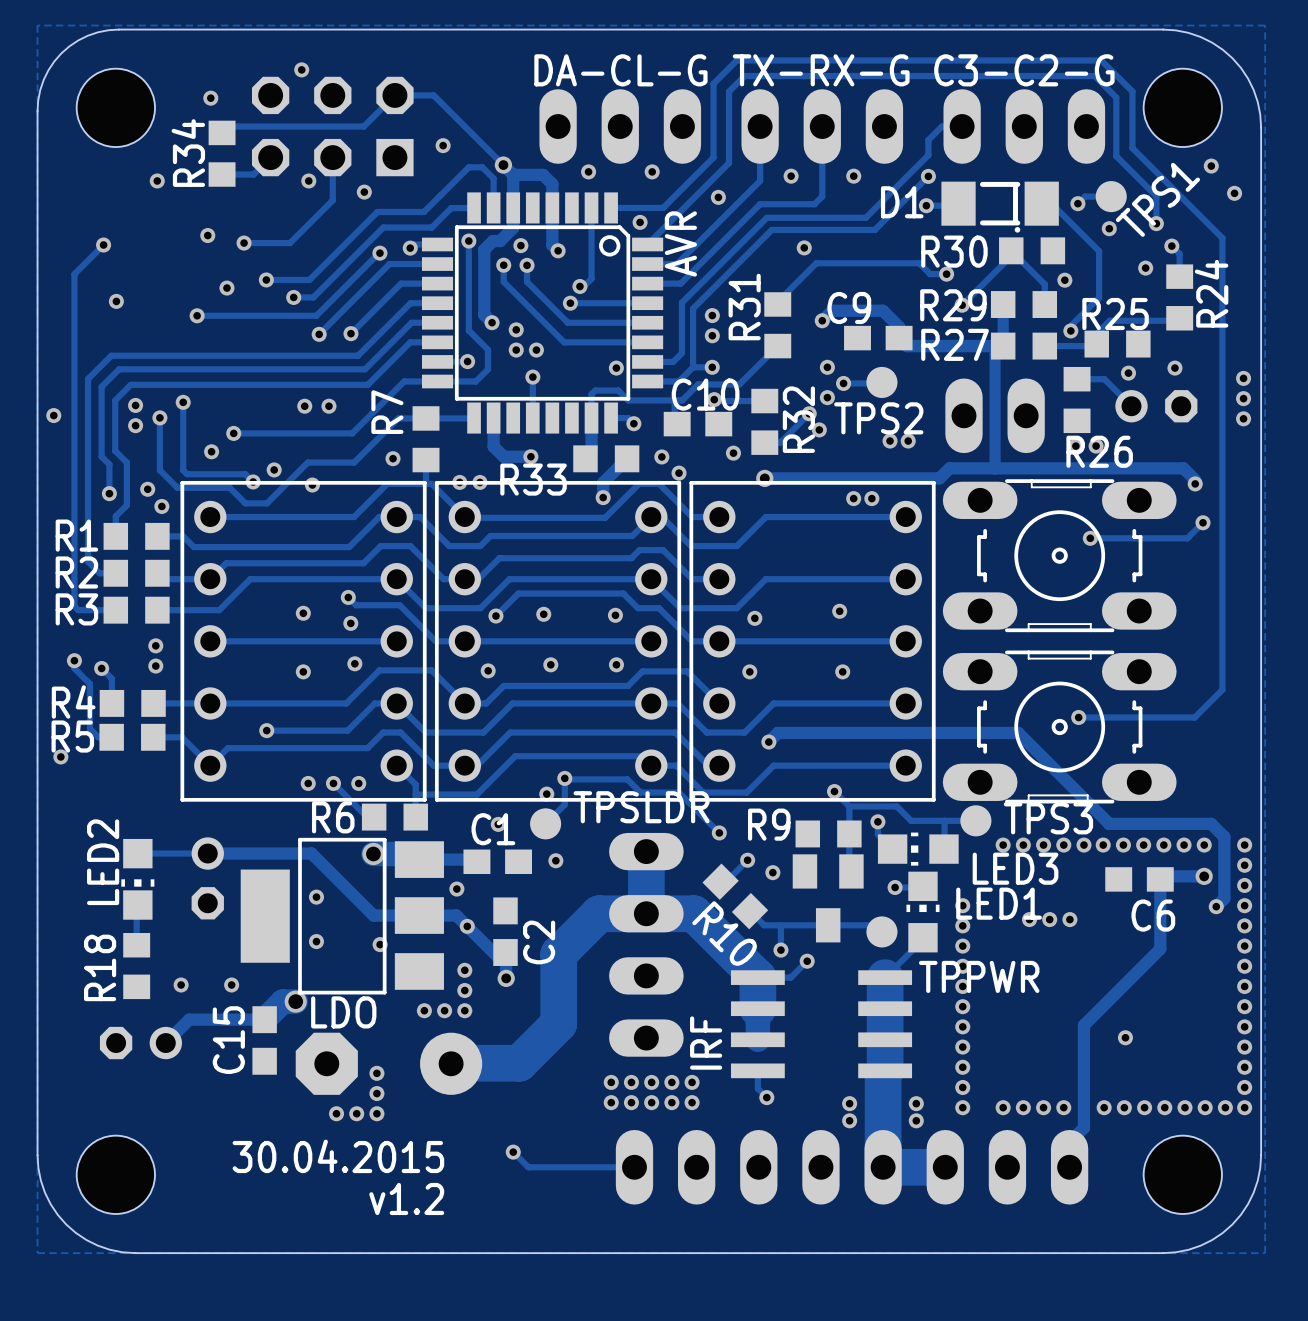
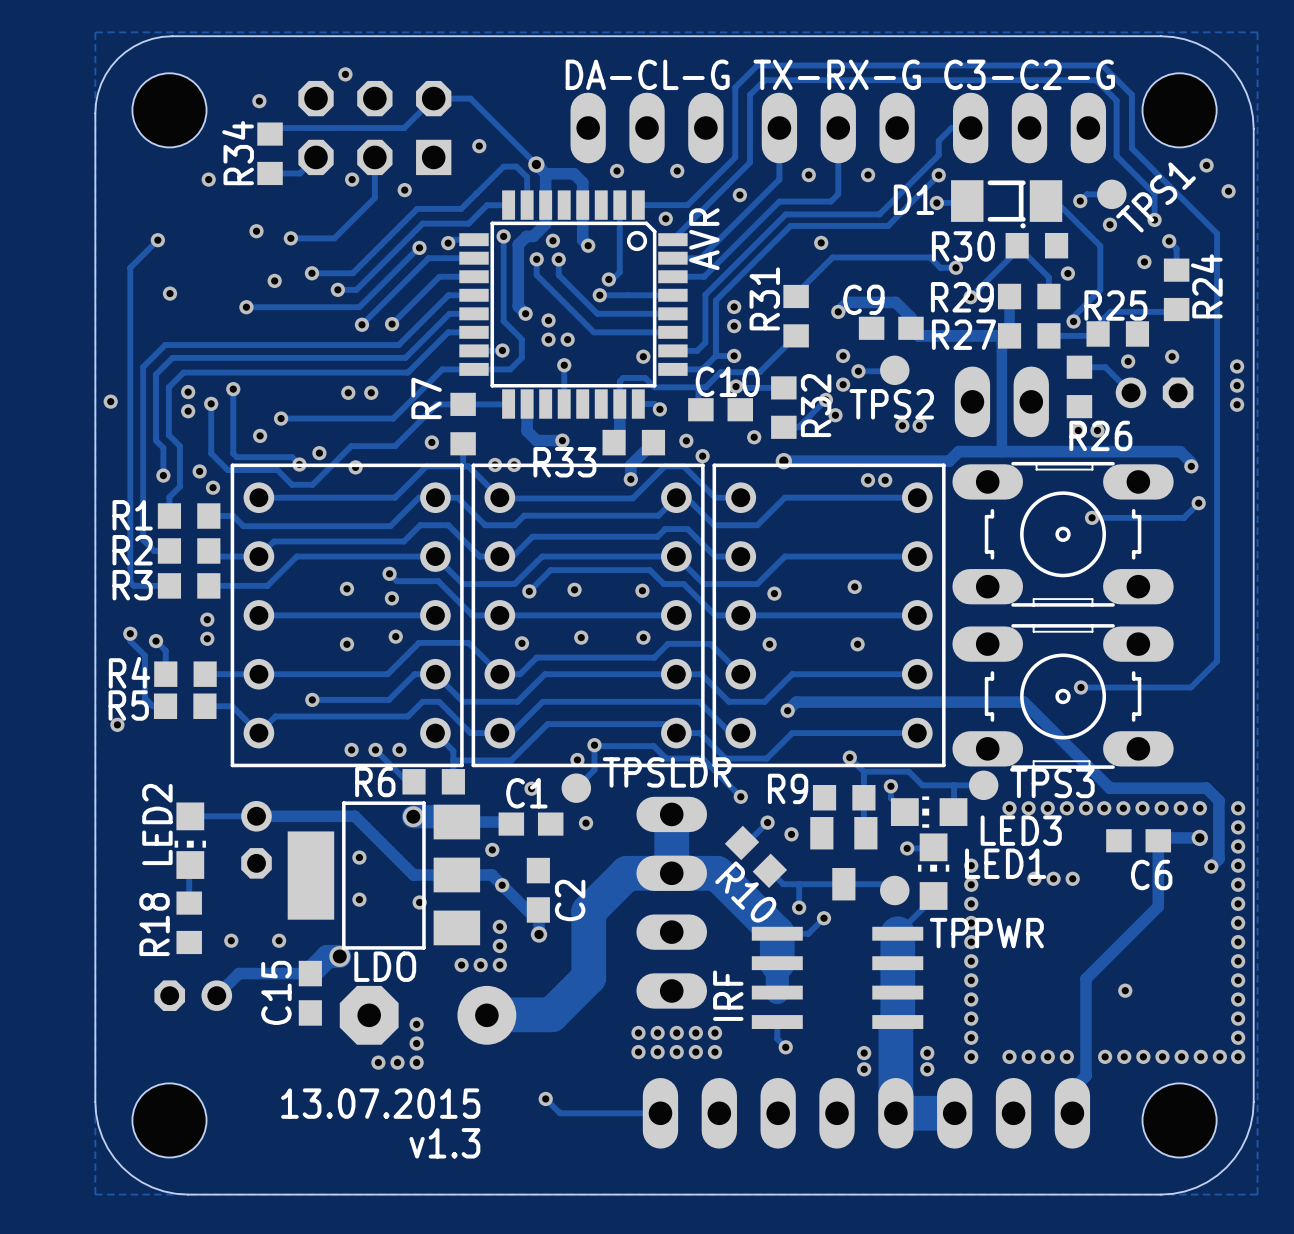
text: 30.04.2015 (338, 1156) -> 13.07.2015 (380, 1103)
text: v1.2 (406, 1198) -> v1.3 (444, 1143)

